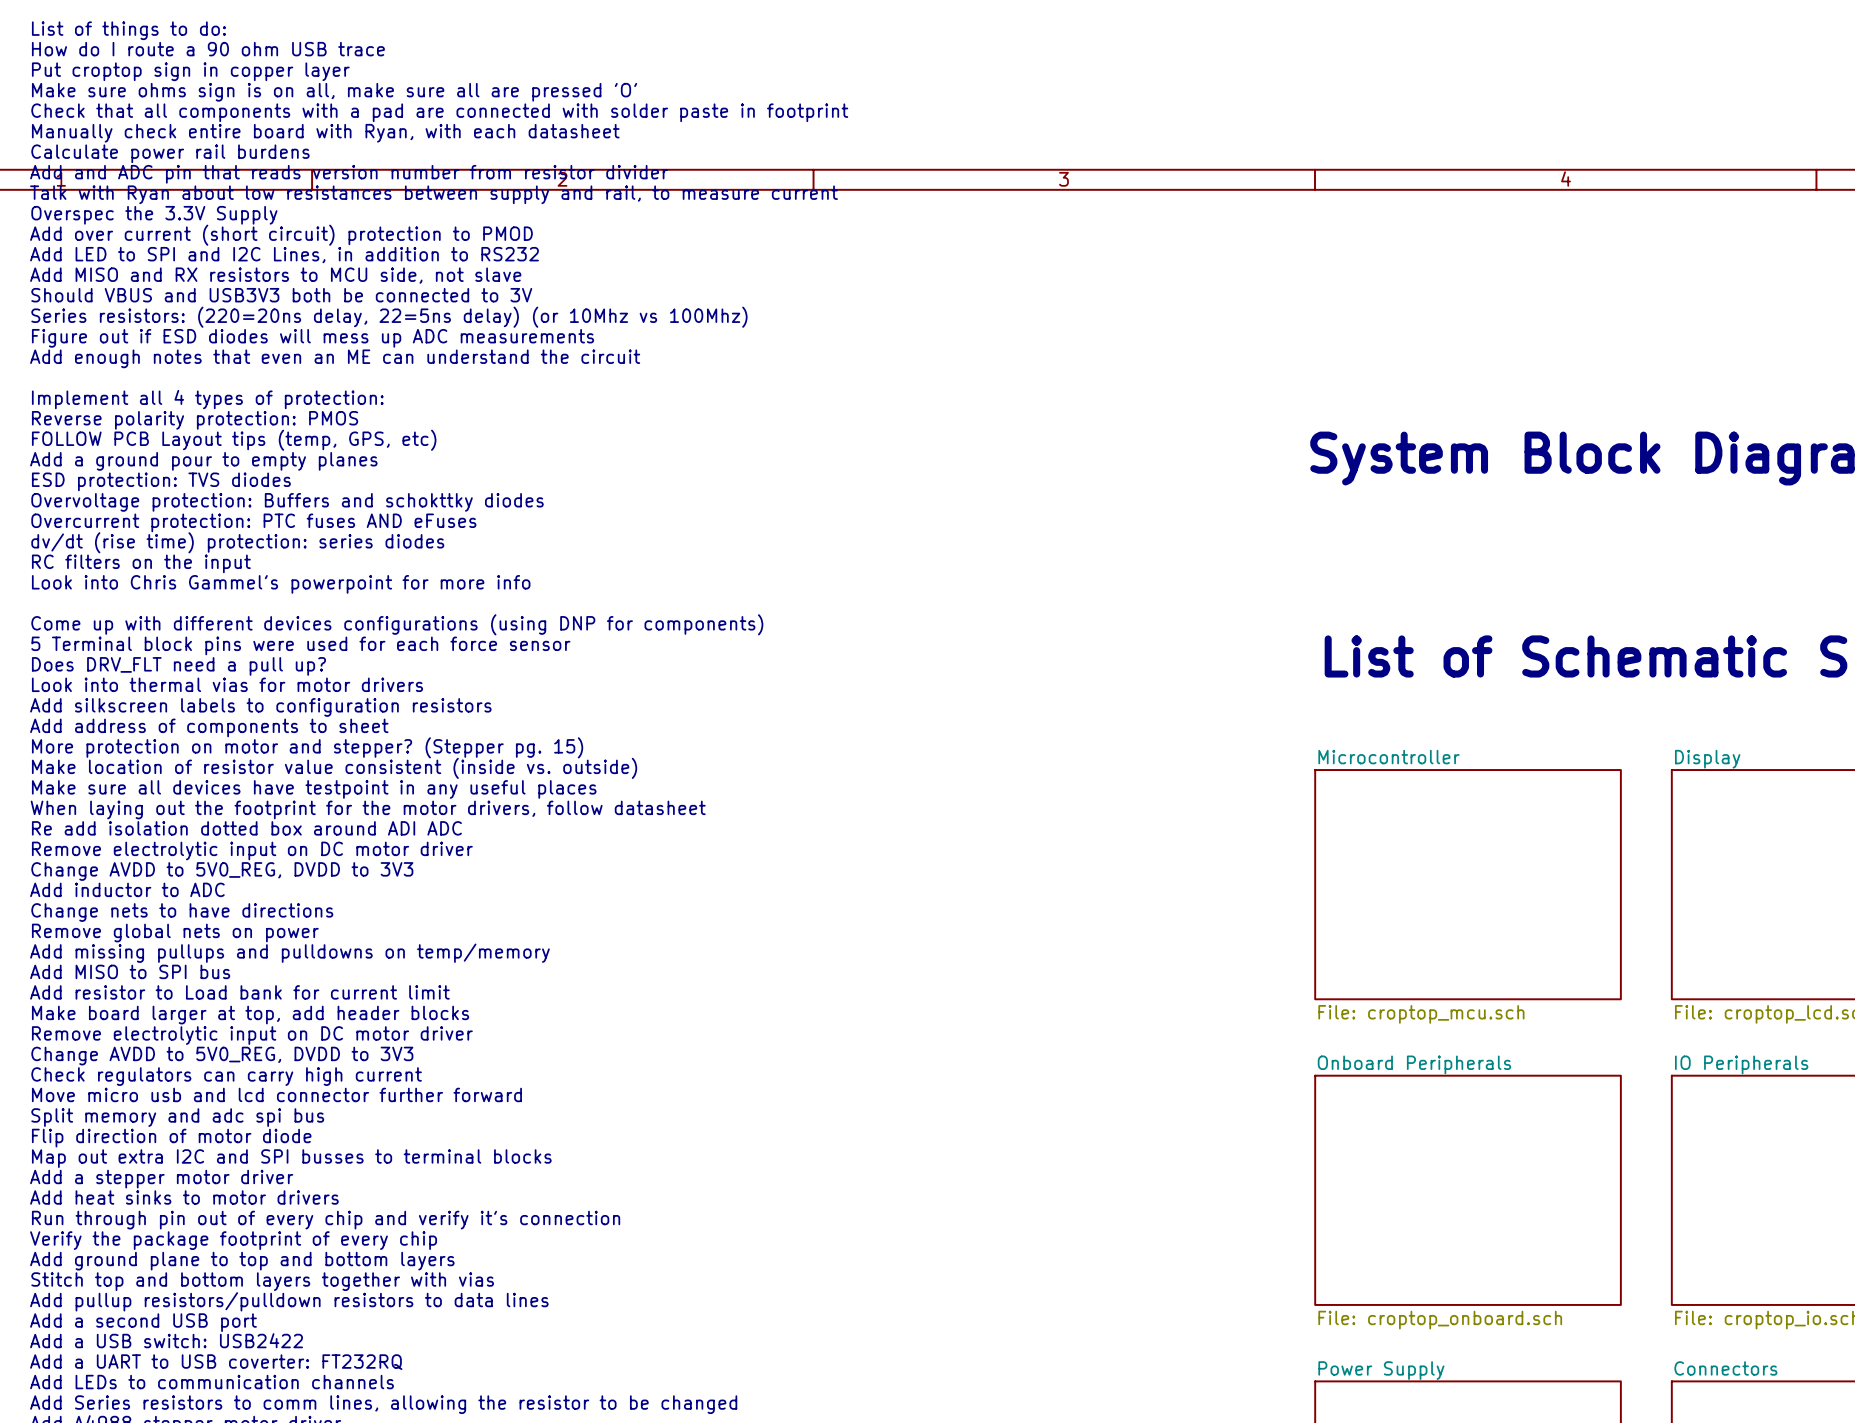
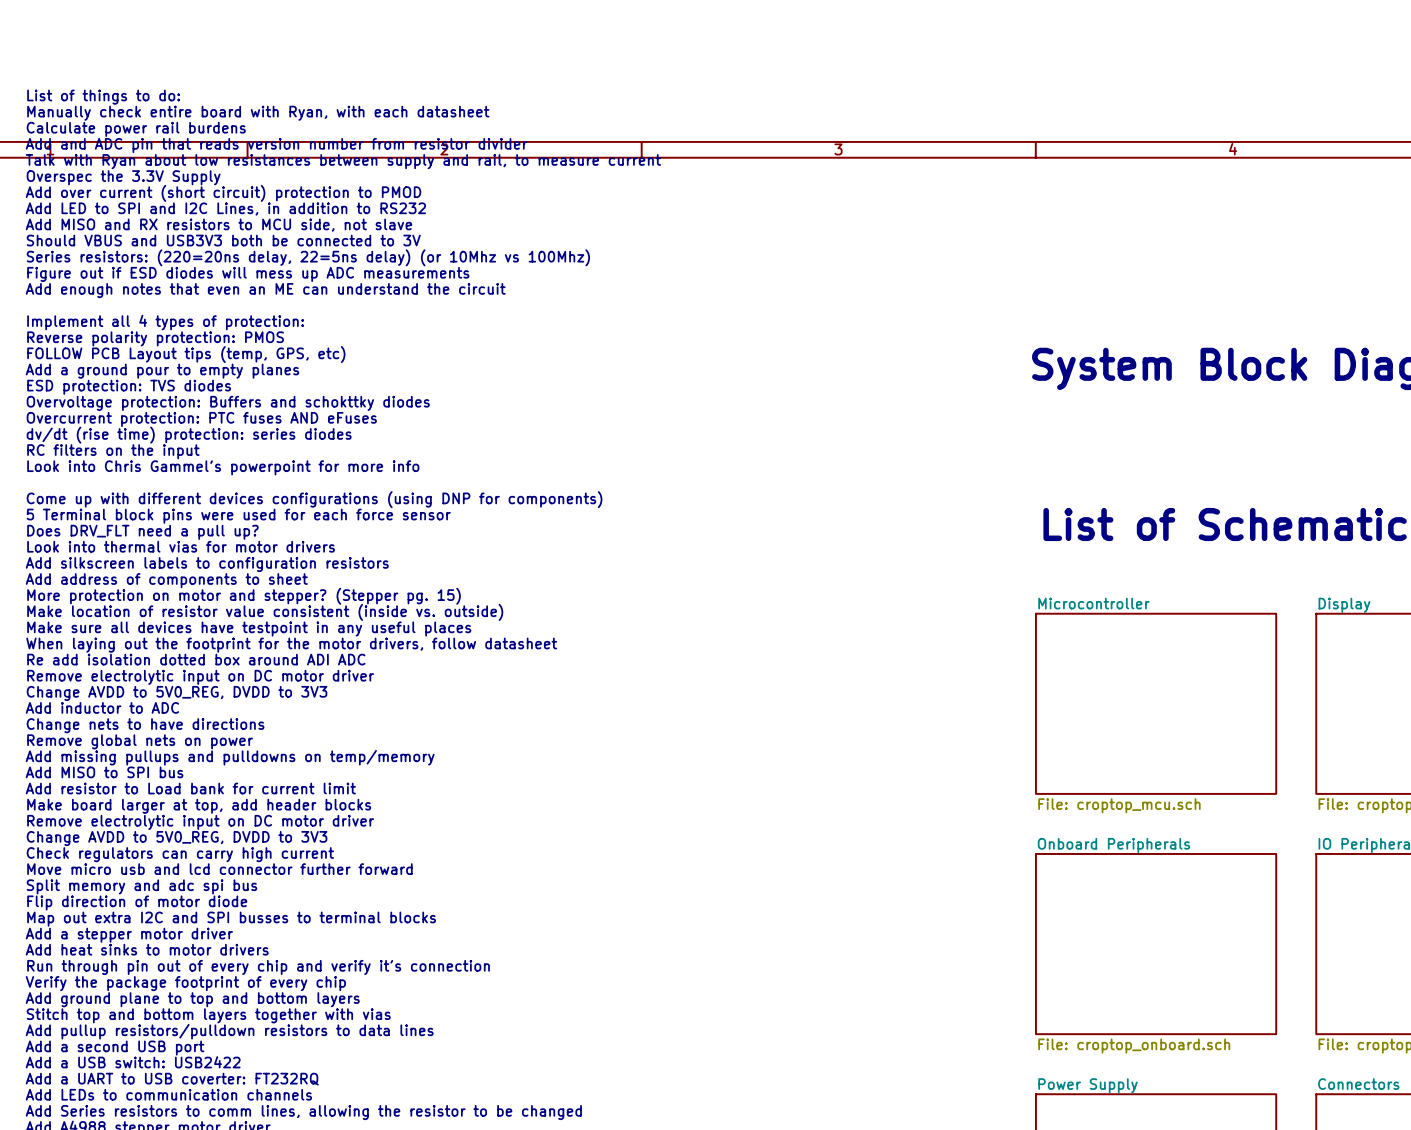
text: List of things to do: (128, 30) -> none
text: How do I route a 90 ohm USB trace (208, 49) -> none
text: Put croptop sign in copper layer (190, 71) -> none
text: Make sure ohms sign is on all, make sure all are pressed 'O' (334, 92) -> none
text: Check that all components with a pad are connected with solder paste in footprint (439, 112) -> List of things to do: (103, 97)

